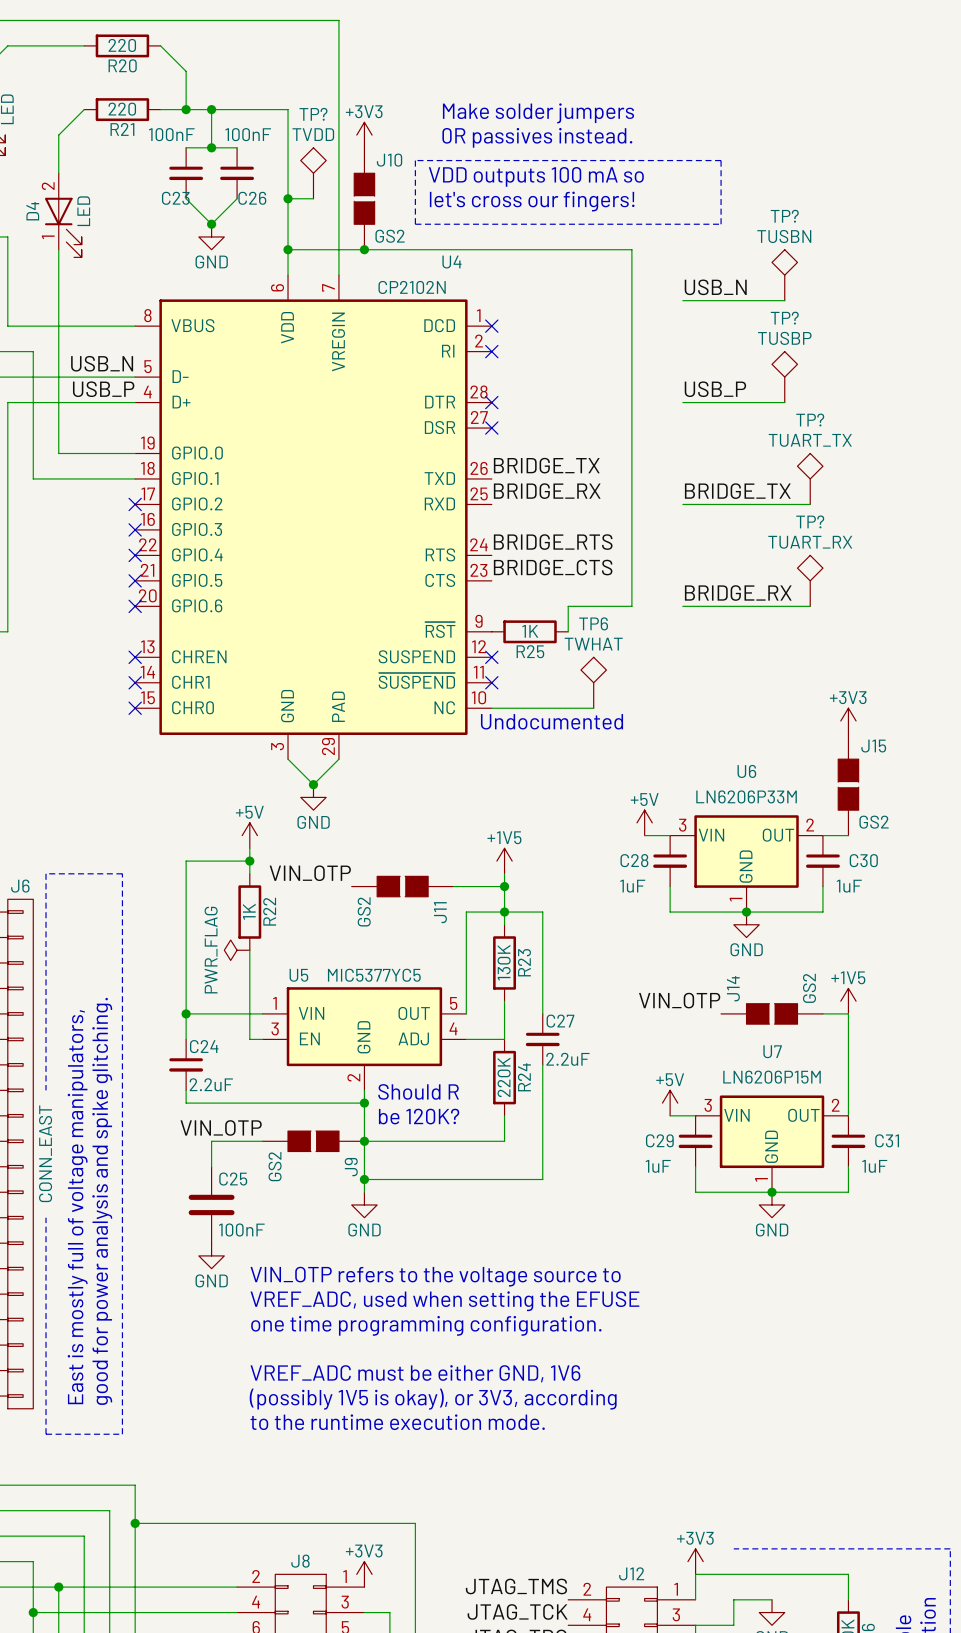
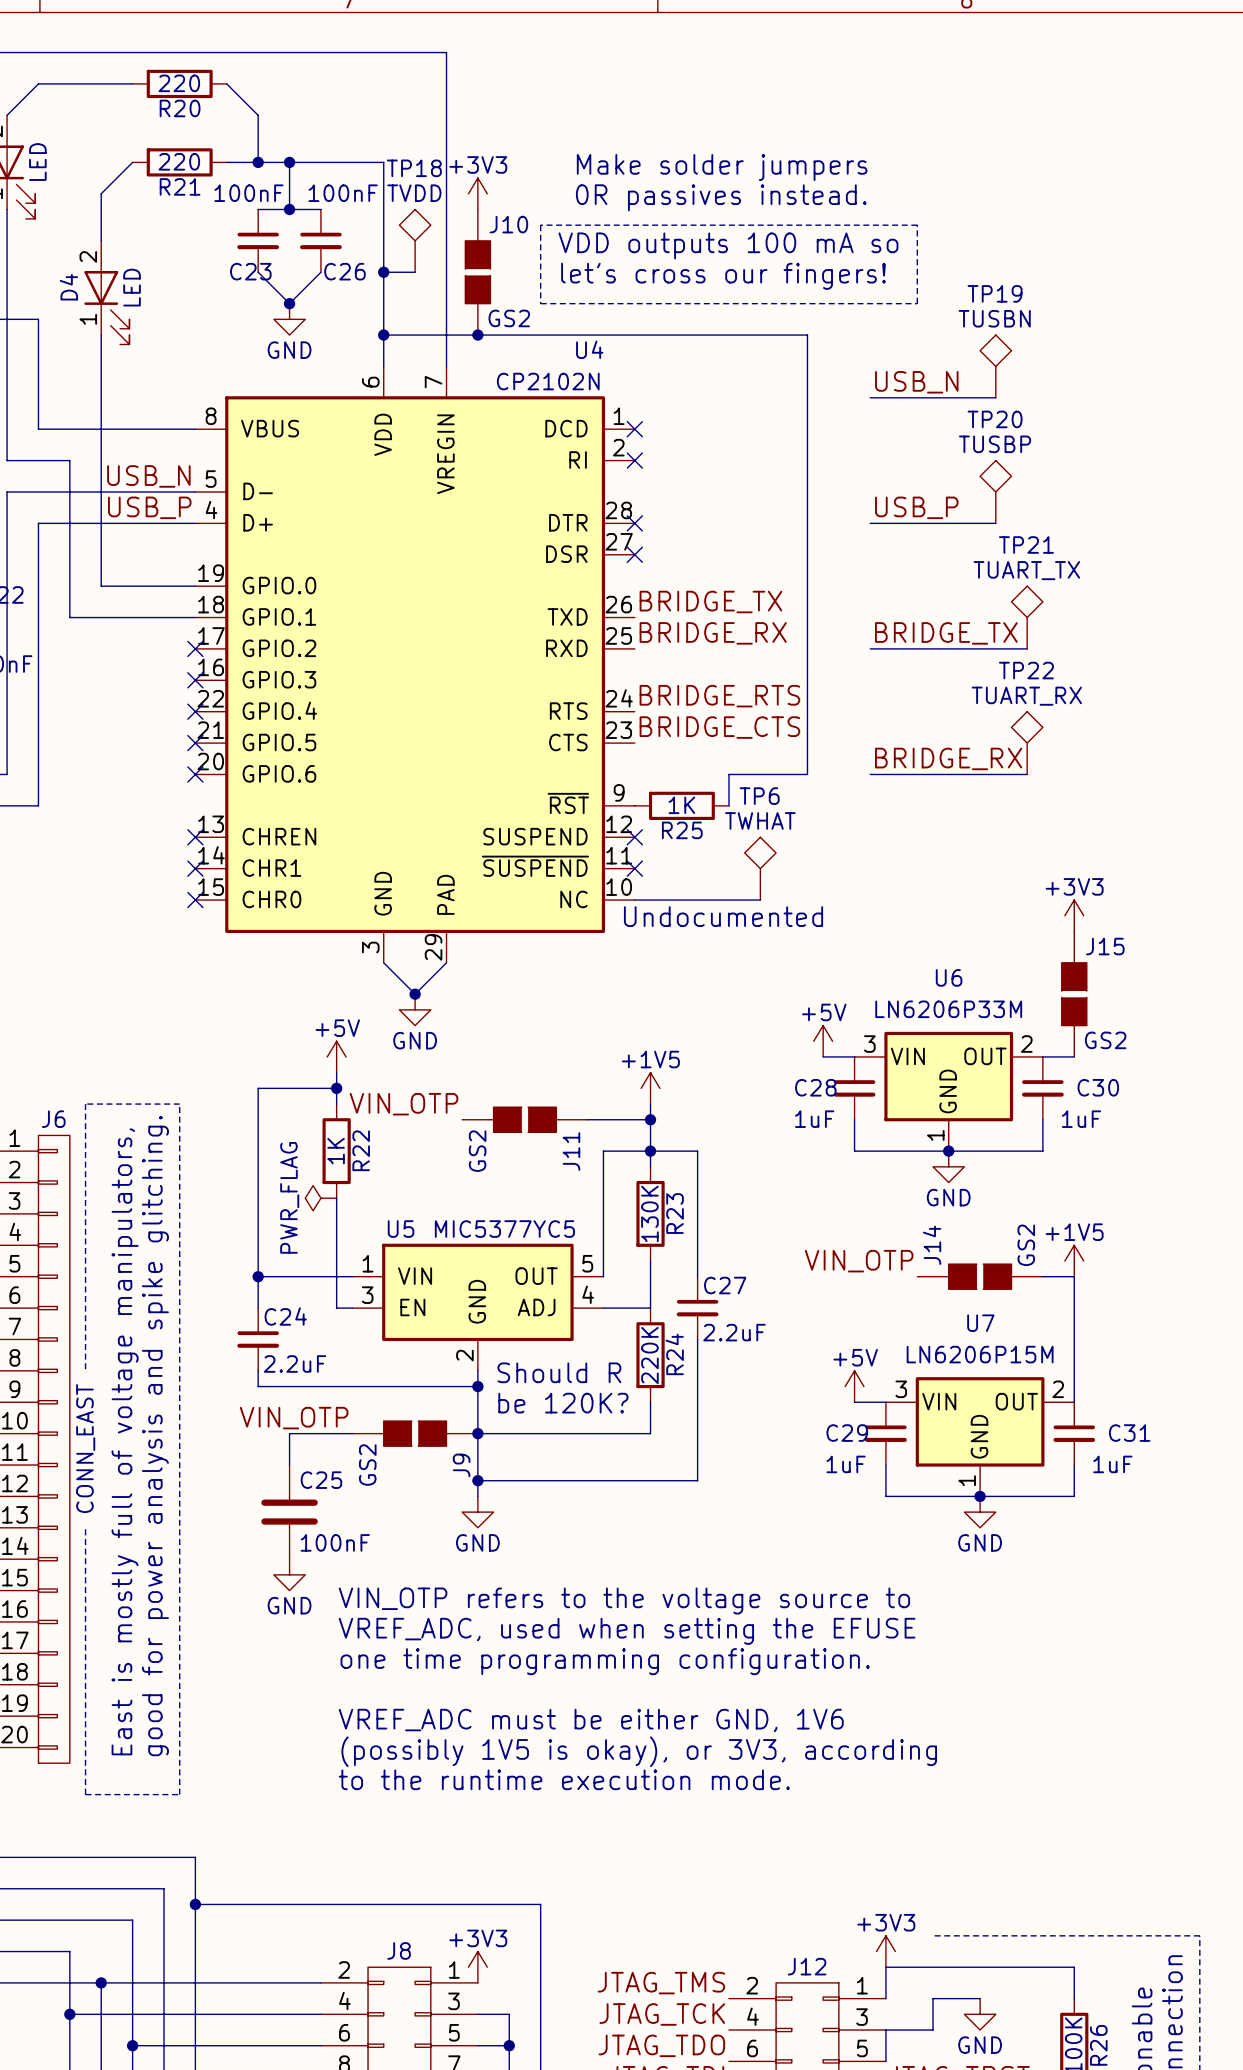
TP? name: TP? (313, 114) -> TP18 (414, 168)
TP? name: TP? (784, 216) -> TP19 (995, 293)
TP? name: TP? (784, 318) -> TP20 (995, 419)
TP? name: TP? (810, 420) -> TP21 (1026, 544)
TP? name: TP? (810, 521) -> TP22 (1026, 670)

